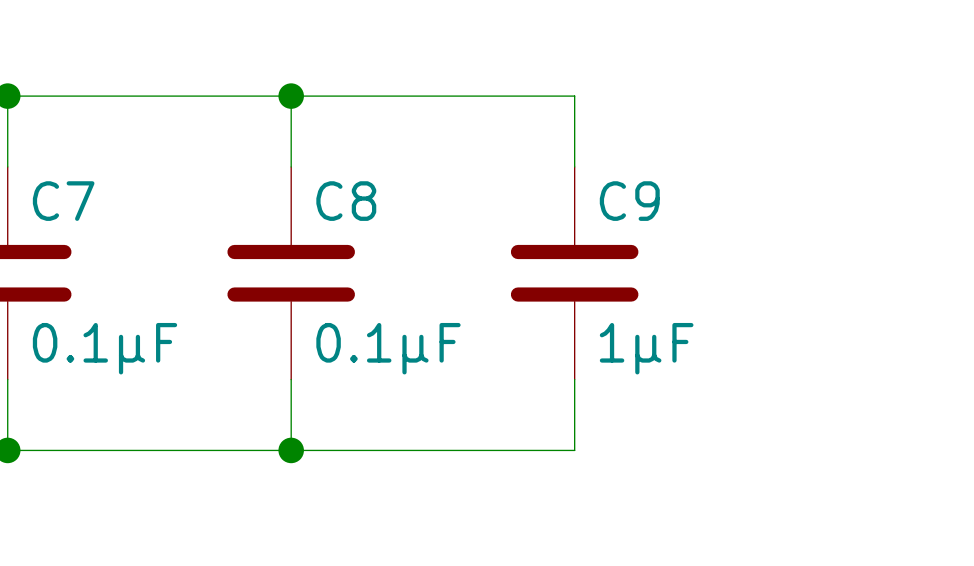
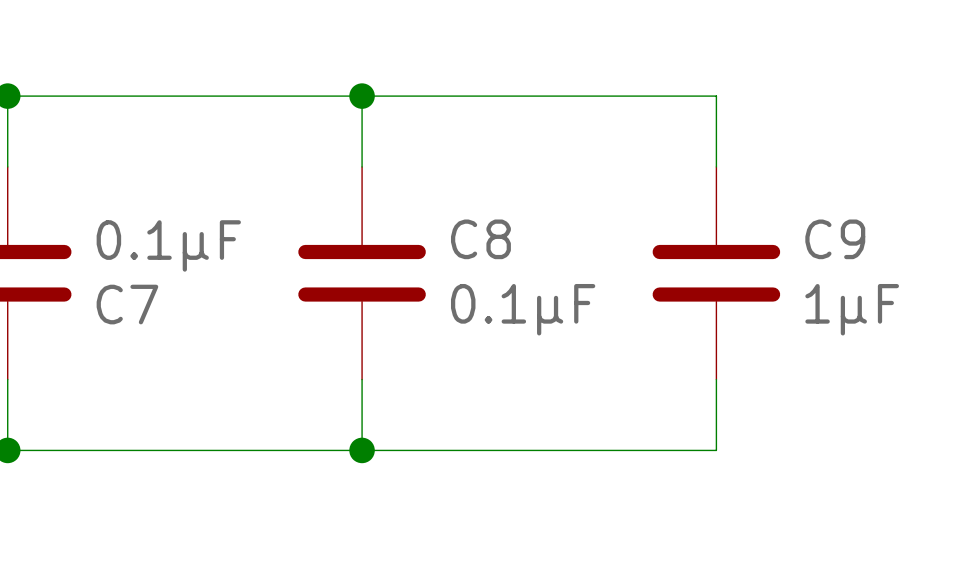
wire: (291, 96) (291, 166) -> (362, 96) (362, 166)
junction position: (291, 96) -> (362, 96)
wire: (574, 96) (574, 166) -> (574, 96) (716, 96) (716, 166)
C7 name position: C7 (63, 201) -> C7 (127, 304)
C8 name position: C8 (346, 201) -> C8 (480, 239)
C9 name position: C9 (629, 201) -> C9 (835, 239)
C8 position: (291, 273) -> (362, 273)
C9 position: (574, 273) -> (716, 273)
C7 value position: 0.1μF (105, 348) -> 0.1μF (168, 245)
C8 value position: 0.1μF (388, 348) -> 0.1μF (523, 309)
C9 value position: 1μF (646, 348) -> 1μF (852, 309)
wire: (291, 379) (291, 450) -> (362, 379) (362, 450)
wire: (574, 379) (574, 450) -> (716, 379) (716, 450) (574, 450)
junction position: (291, 450) -> (362, 450)

